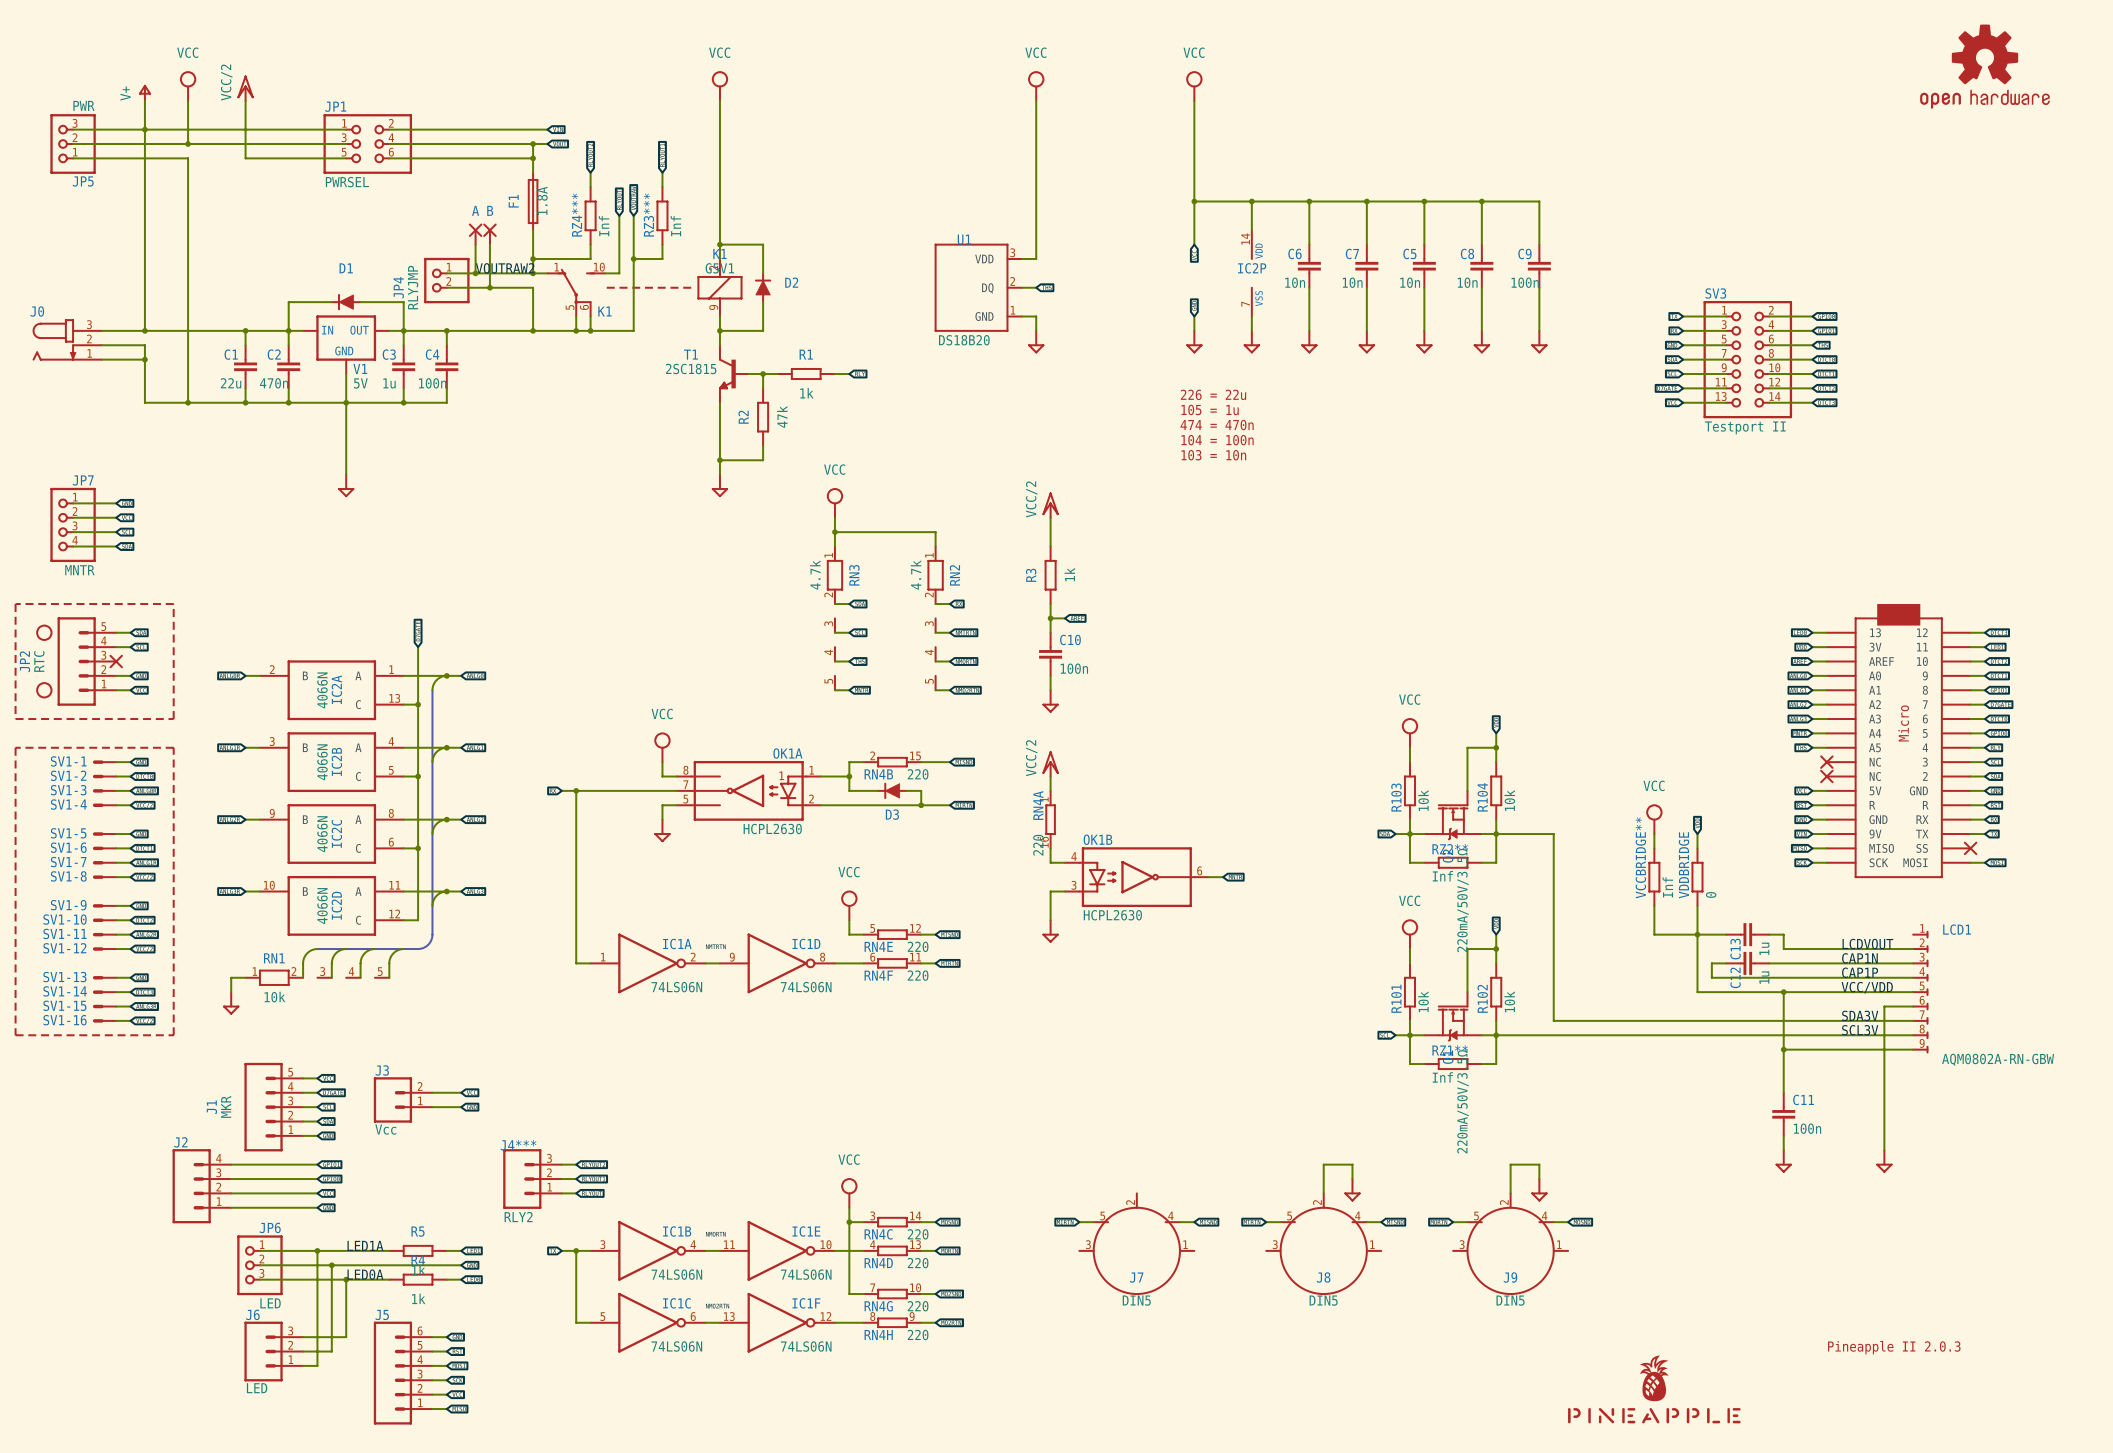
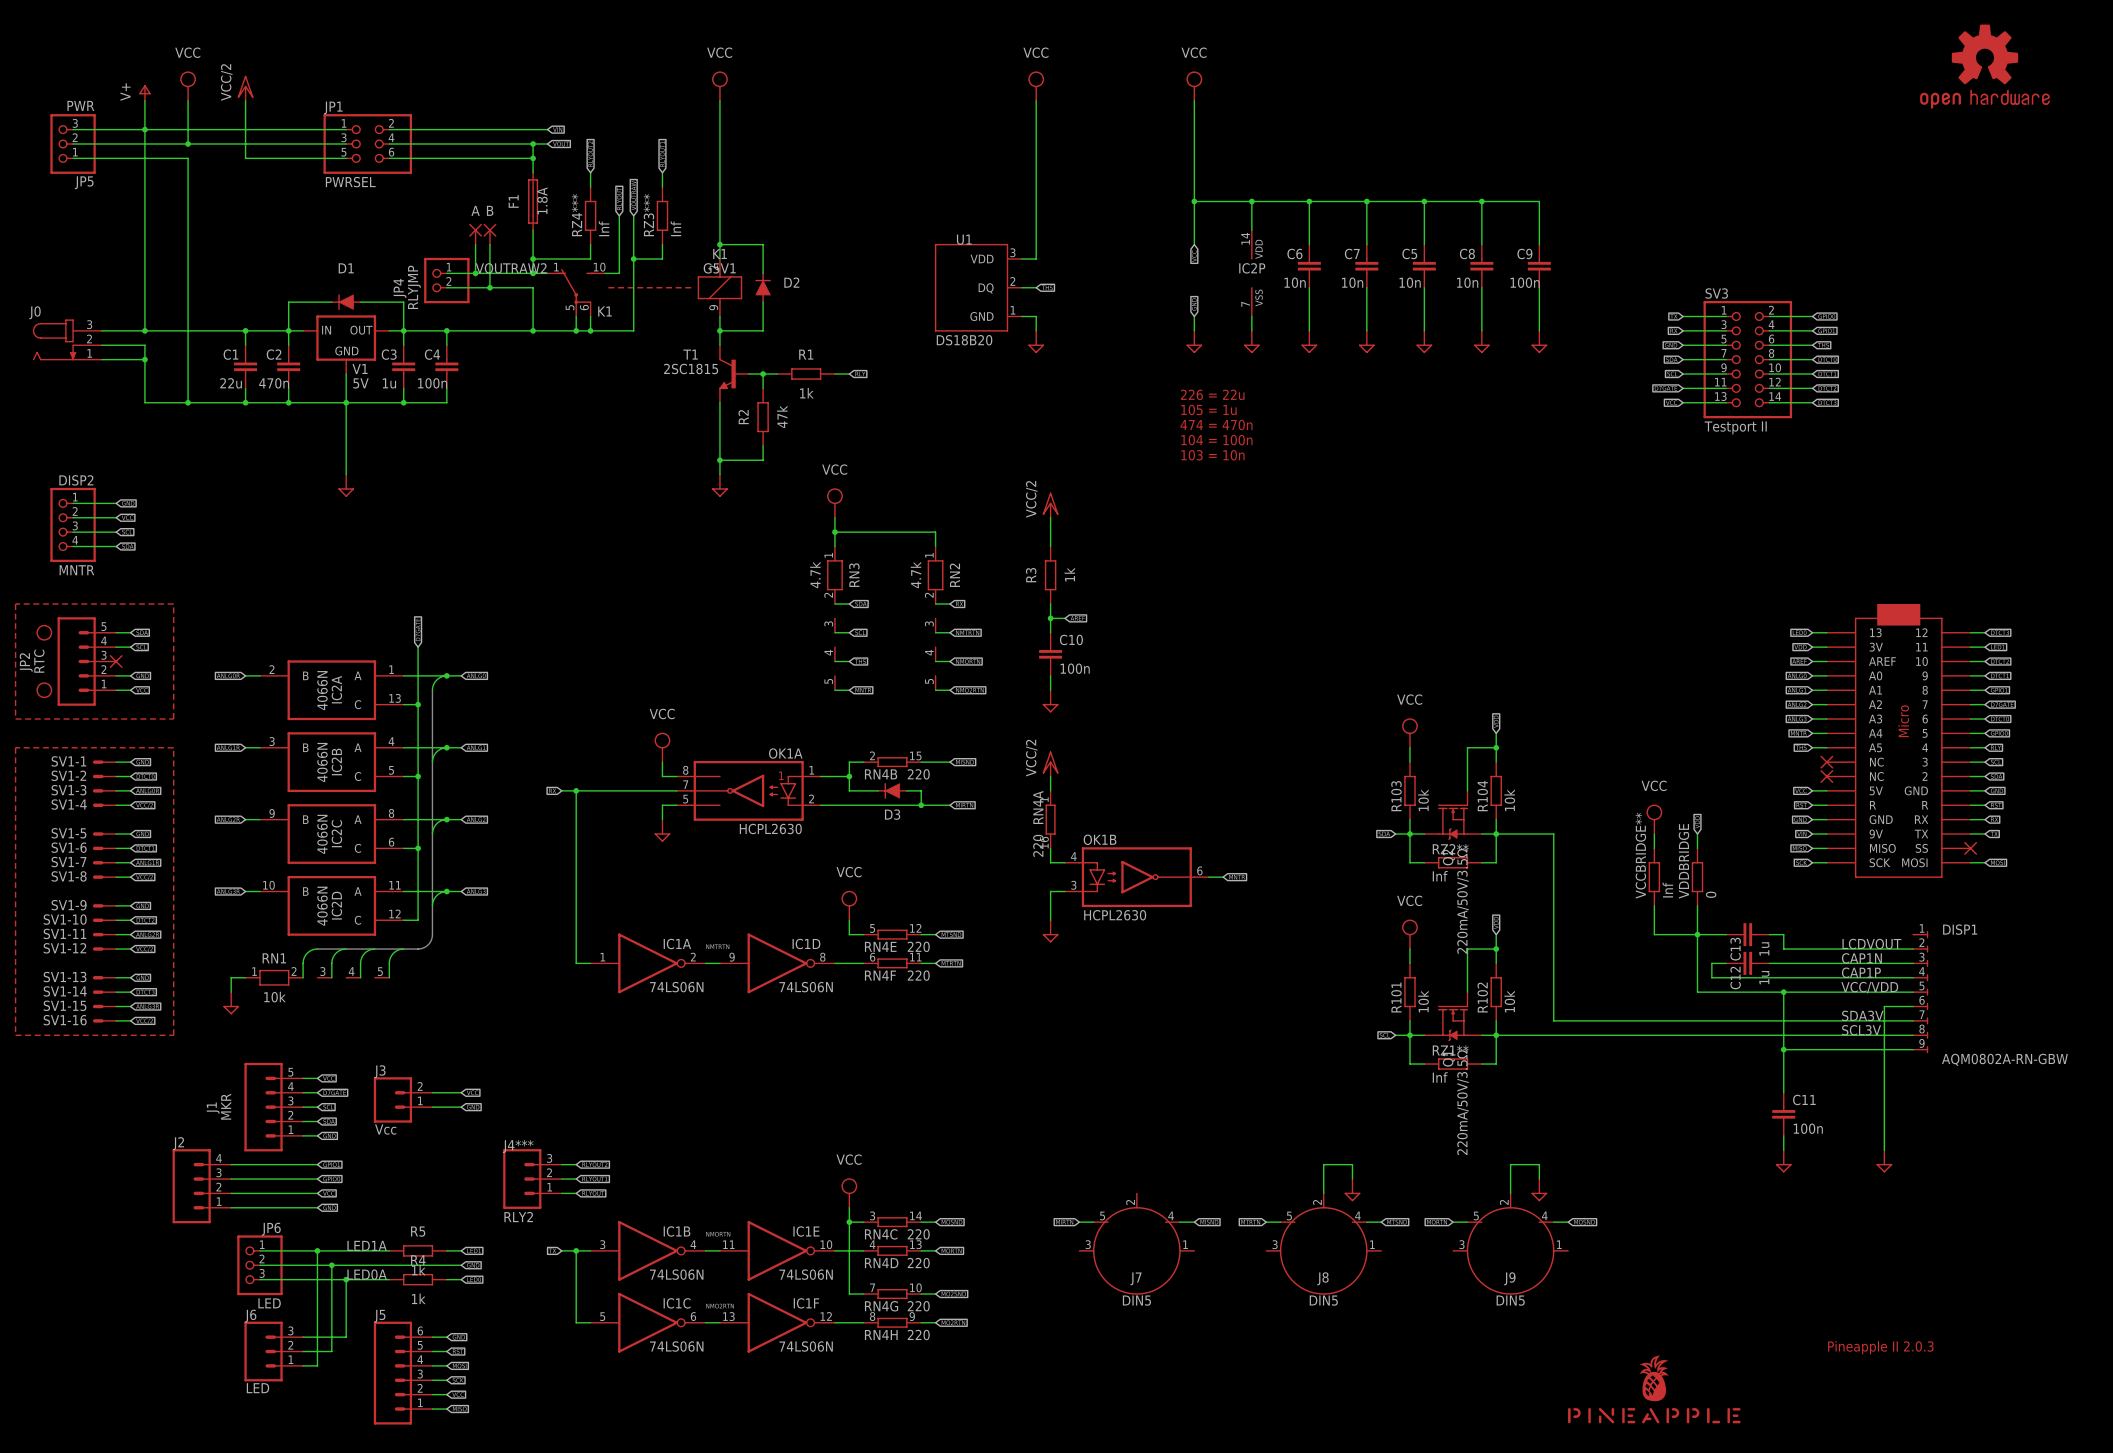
JP7 name: JP7 (83, 480) -> DISP2 (76, 480)
LCD1 name: LCD1 (1957, 929) -> DISP1 (1960, 929)

